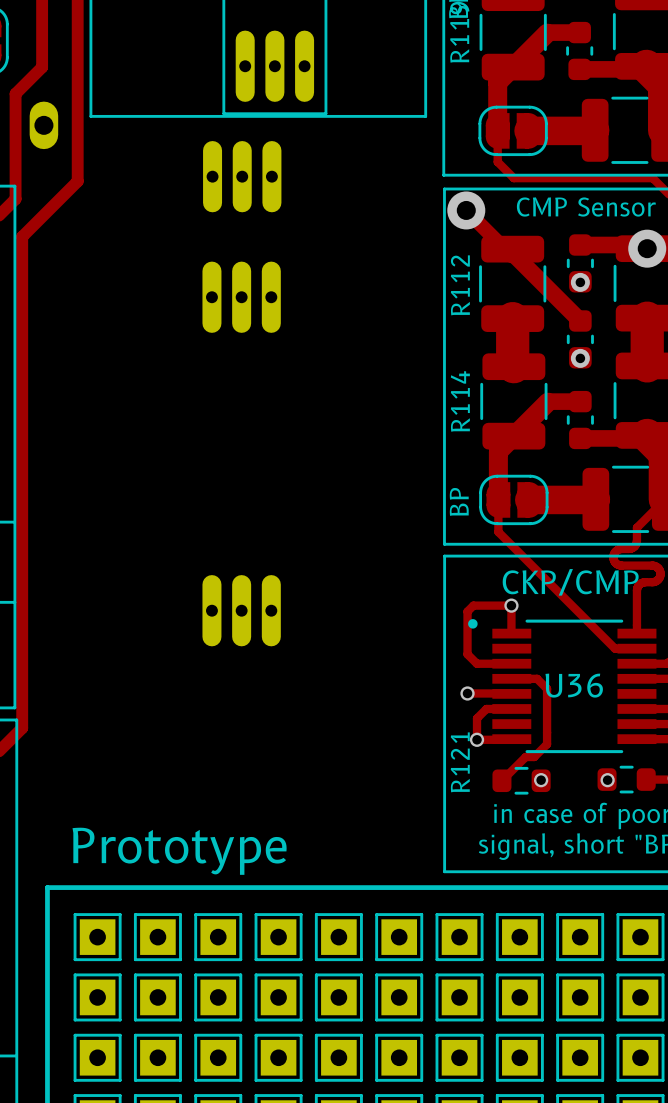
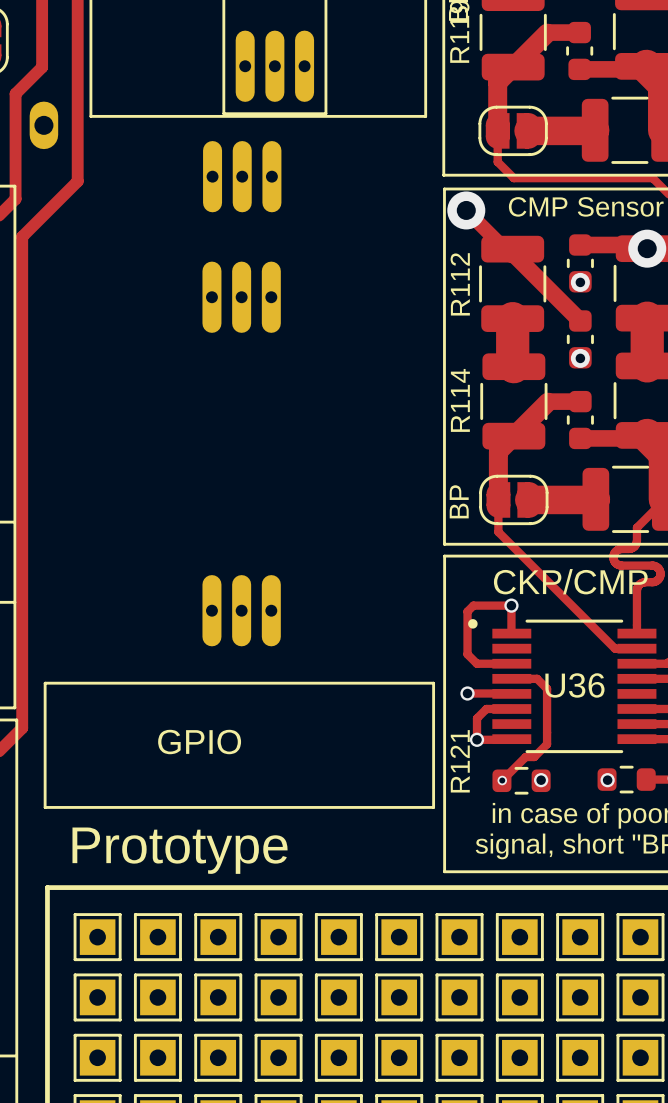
line: none -> (45, 683) (433, 683) (433, 807) (45, 807) (45, 683)
text: none -> GPIO (199, 742)
via: none -> (502, 780)

